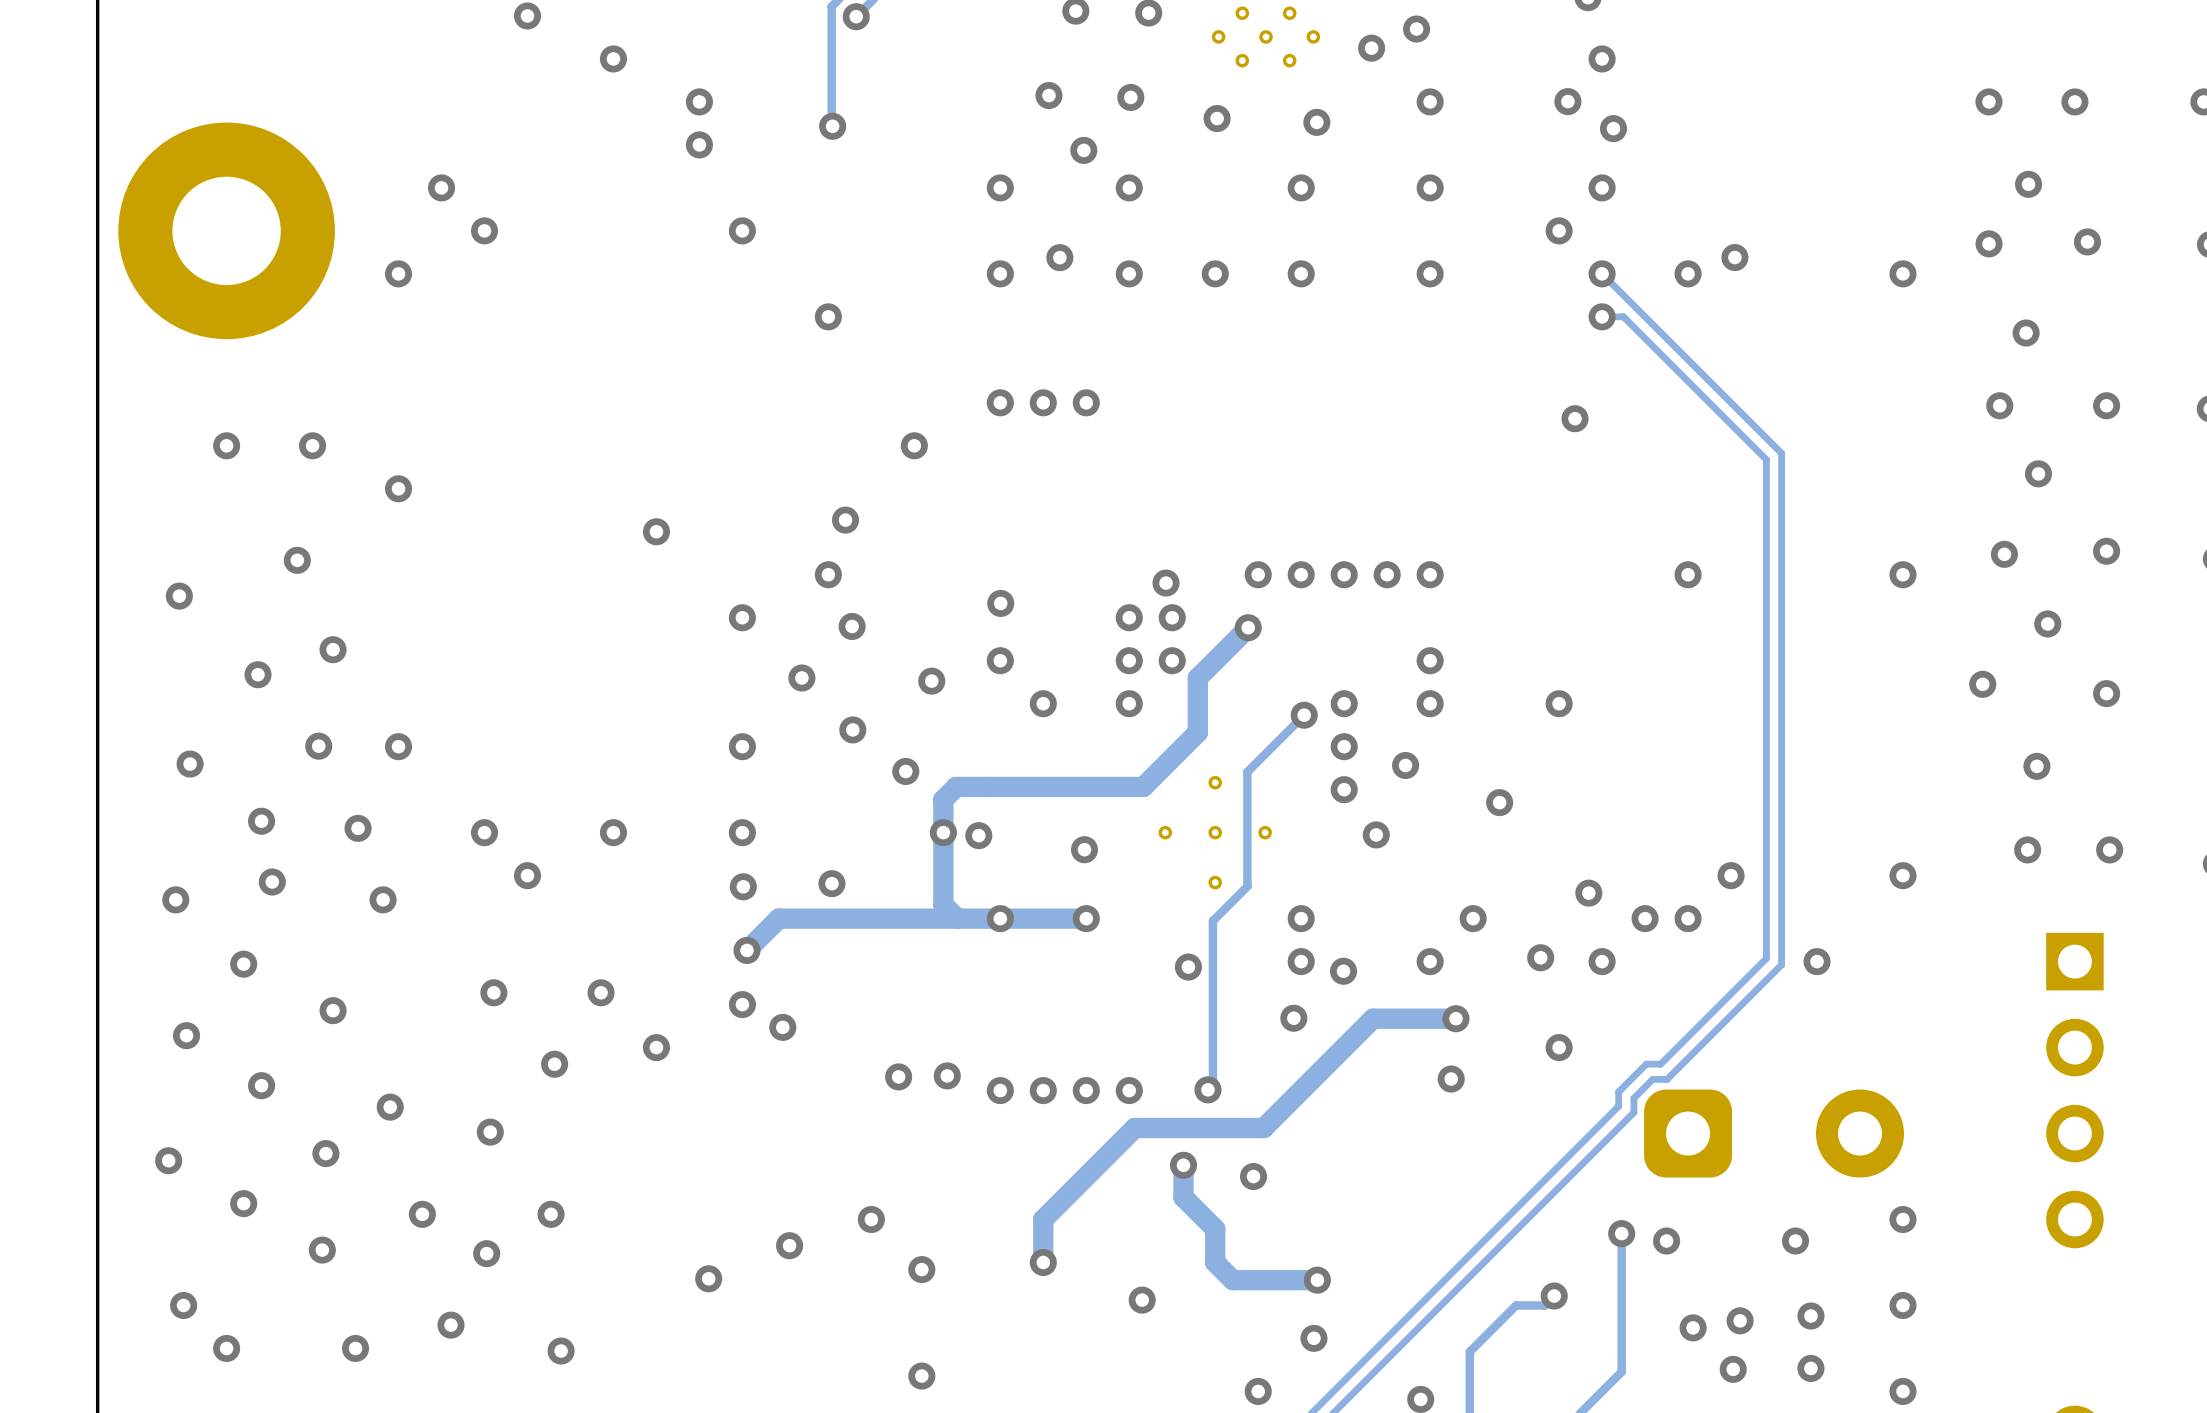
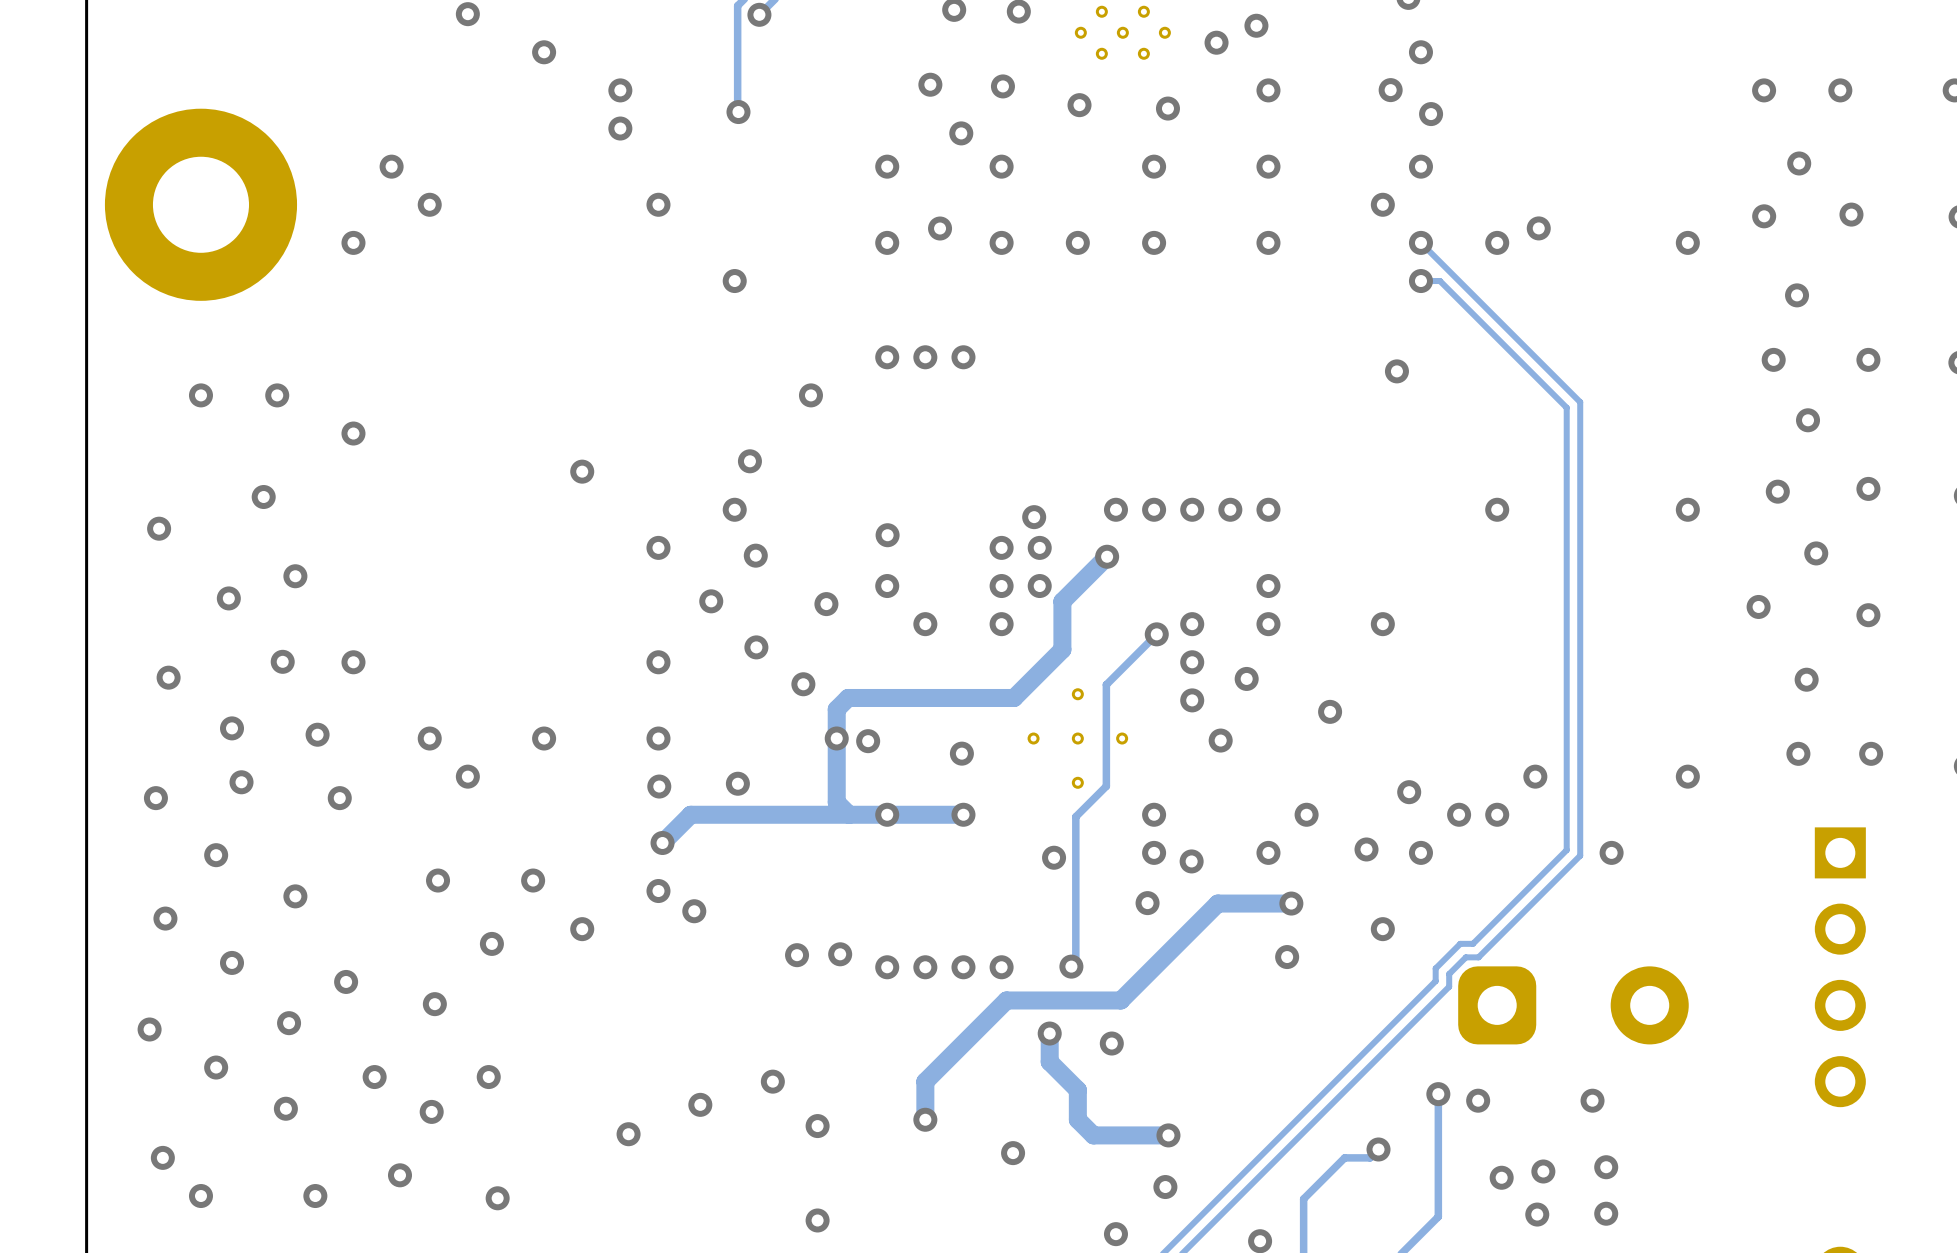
via: (1902, 1219) -> none
via: (1902, 1305) -> none
via: (1902, 1391) -> none

